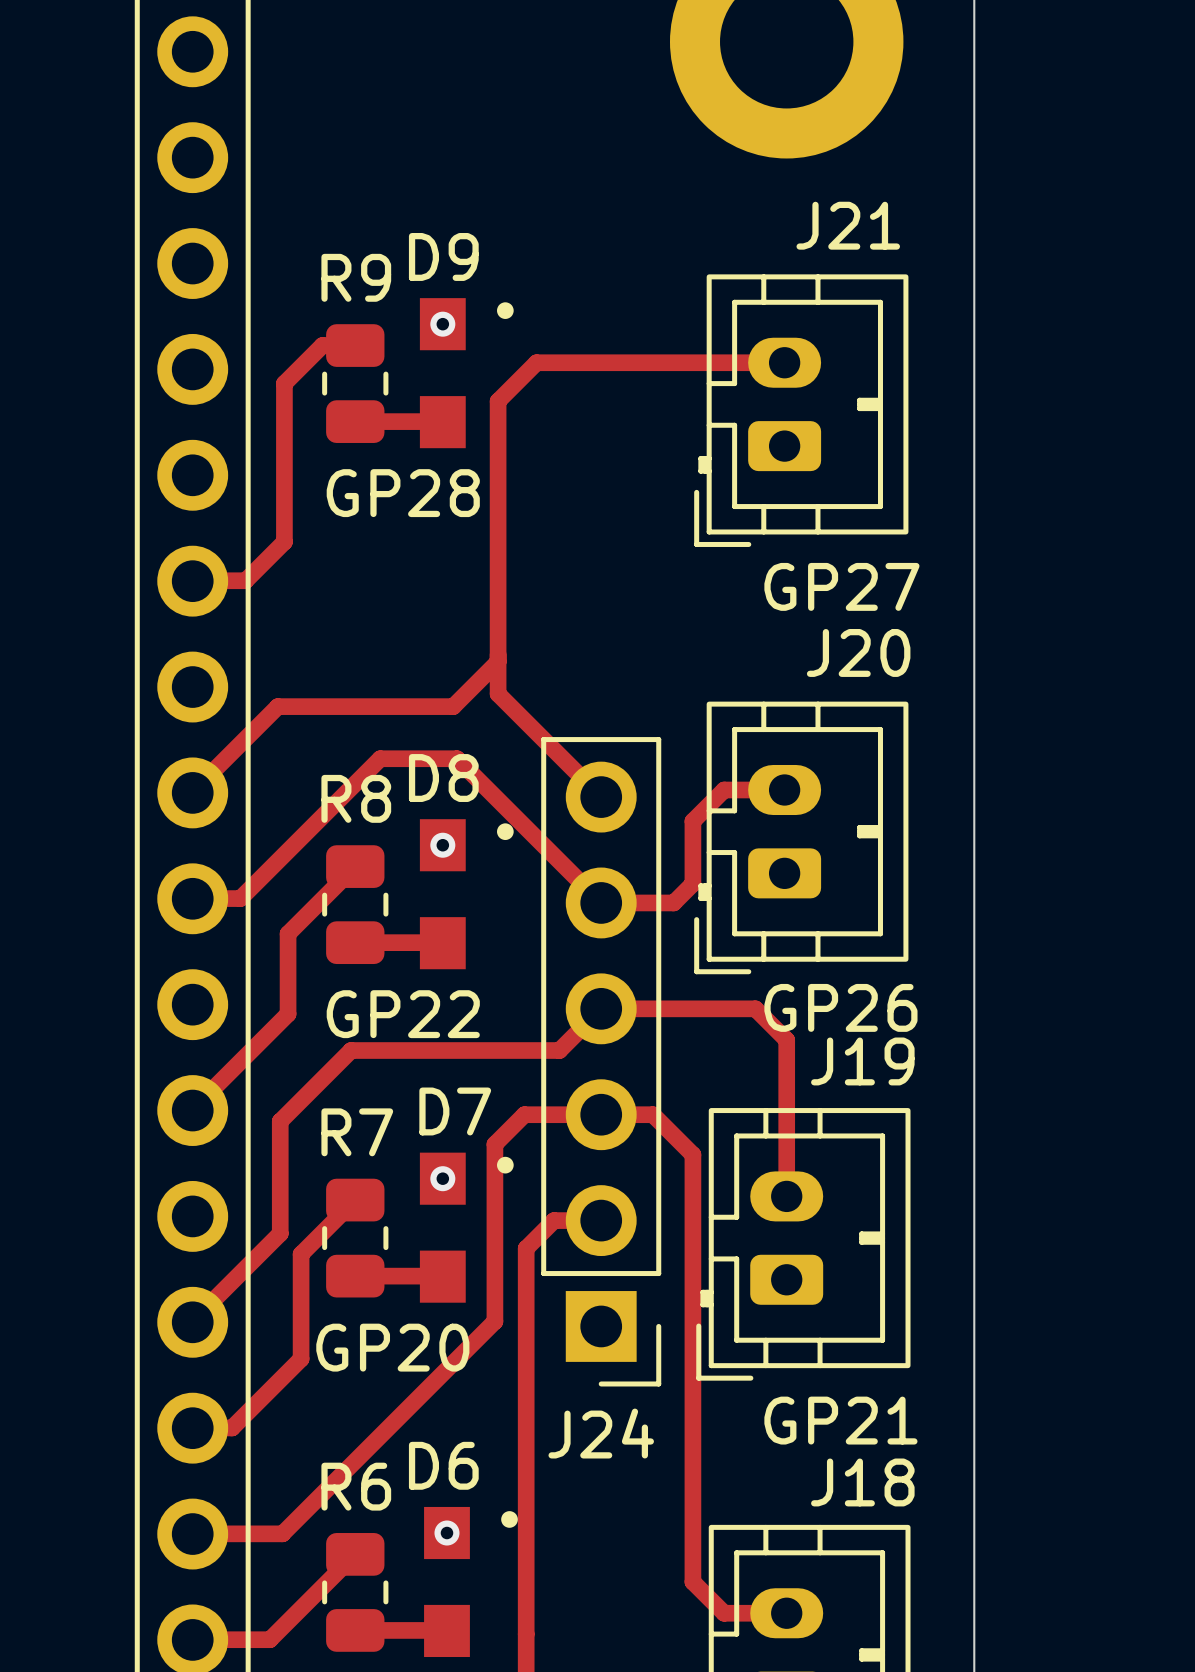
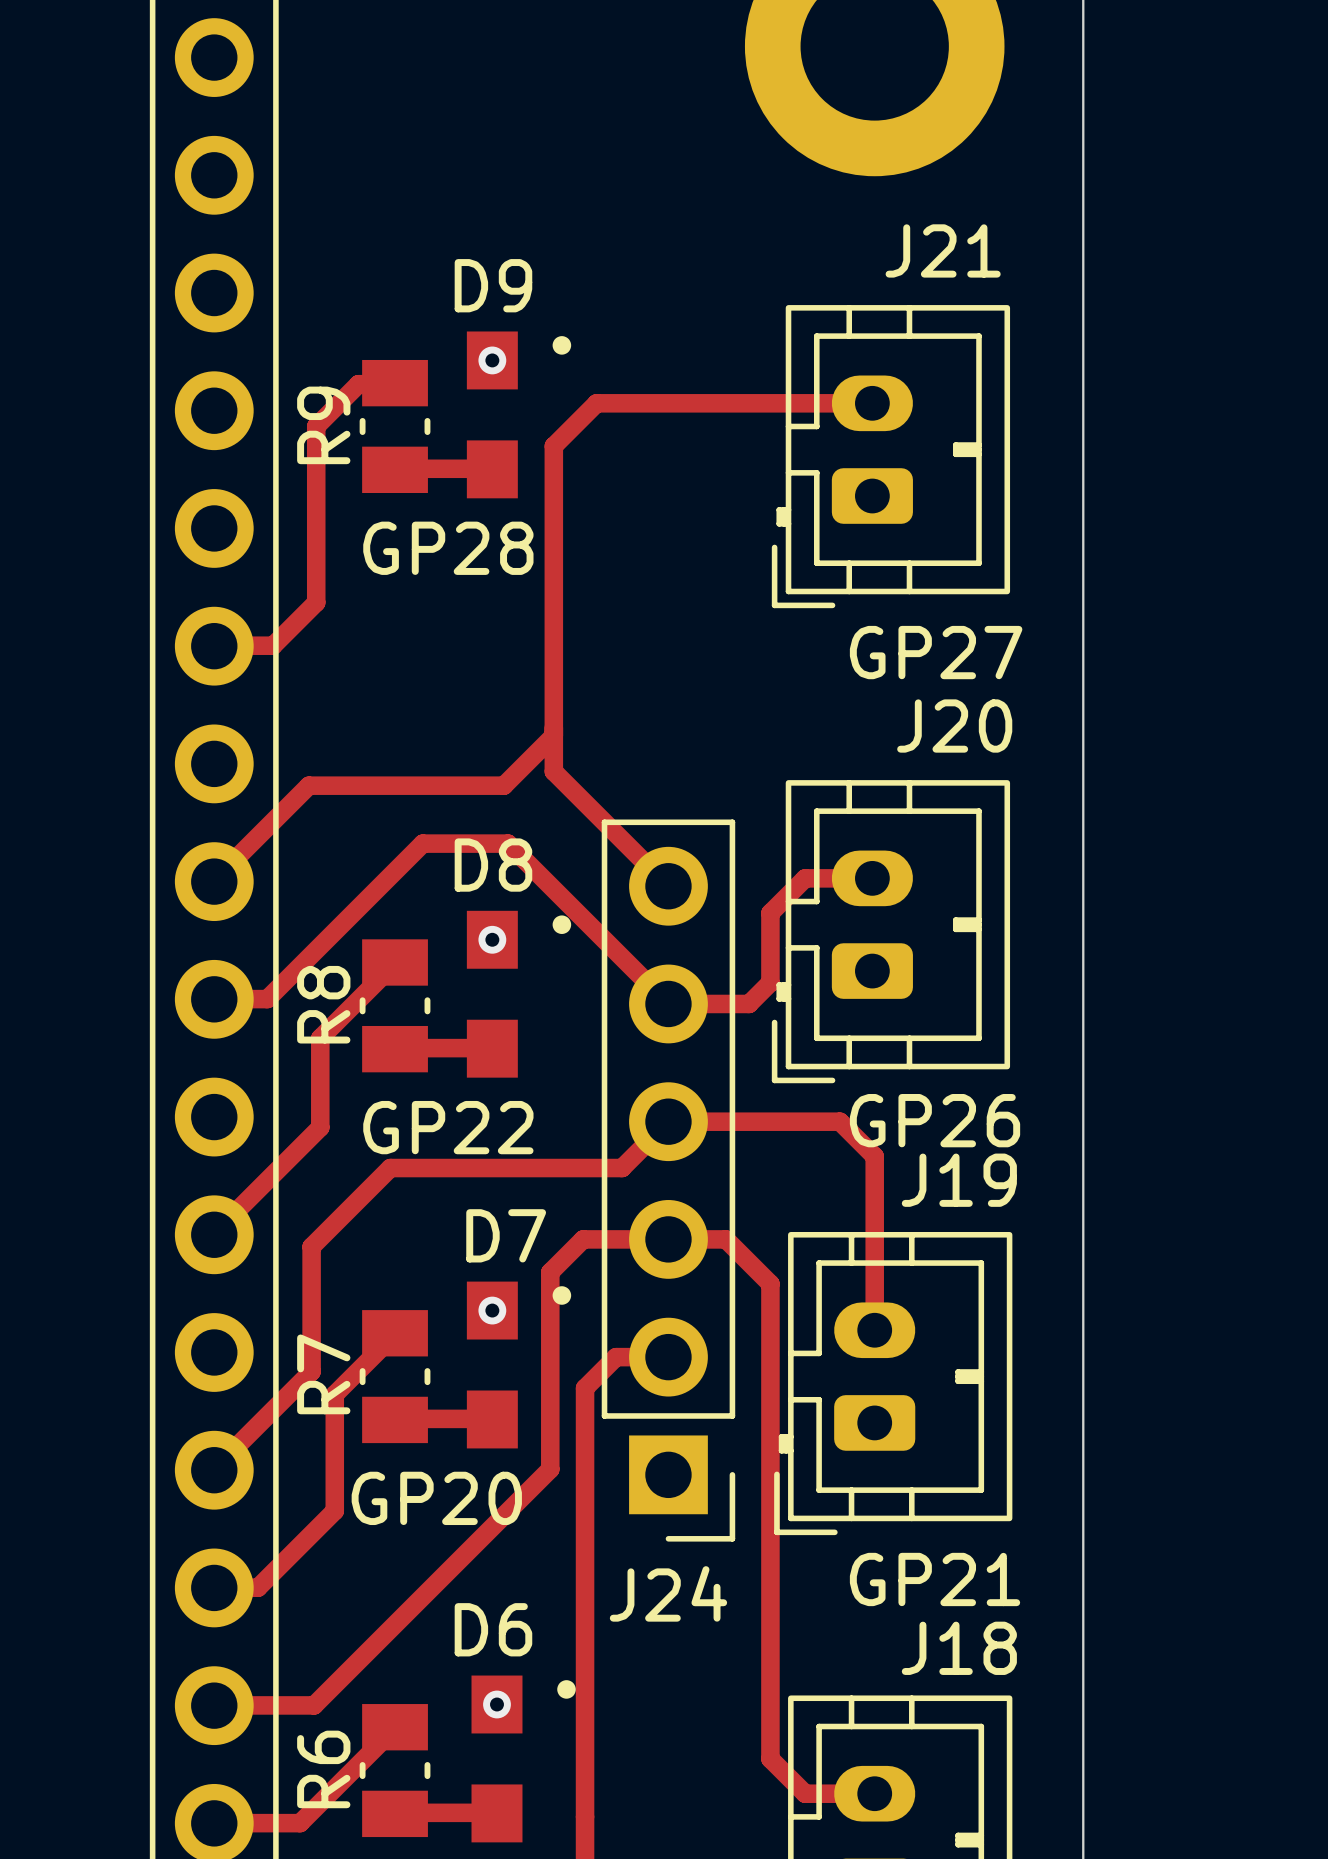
R9 name rotation: 0° (356, 277) -> 90° counterclockwise (323, 425)
R9 name position: R9 (356, 277) -> R9 (323, 425)
R9 footprint: [322, 324, 389, 443] -> [359, 359, 431, 493]
R8 name rotation: 0° (356, 798) -> 90° counterclockwise (323, 1004)
R8 name position: R8 (356, 798) -> R8 (323, 1004)
R8 footprint: [322, 845, 389, 965] -> [359, 939, 431, 1073]
R7 name rotation: 0° (357, 1132) -> 90° counterclockwise (323, 1374)
R7 name position: R7 (357, 1132) -> R7 (323, 1374)
R7 footprint: [322, 1178, 389, 1298] -> [359, 1310, 431, 1444]
R6 name rotation: 0° (356, 1486) -> 90° counterclockwise (323, 1769)
R6 name position: R6 (356, 1486) -> R6 (323, 1769)
R6 footprint: [322, 1533, 389, 1652] -> [359, 1704, 431, 1838]

